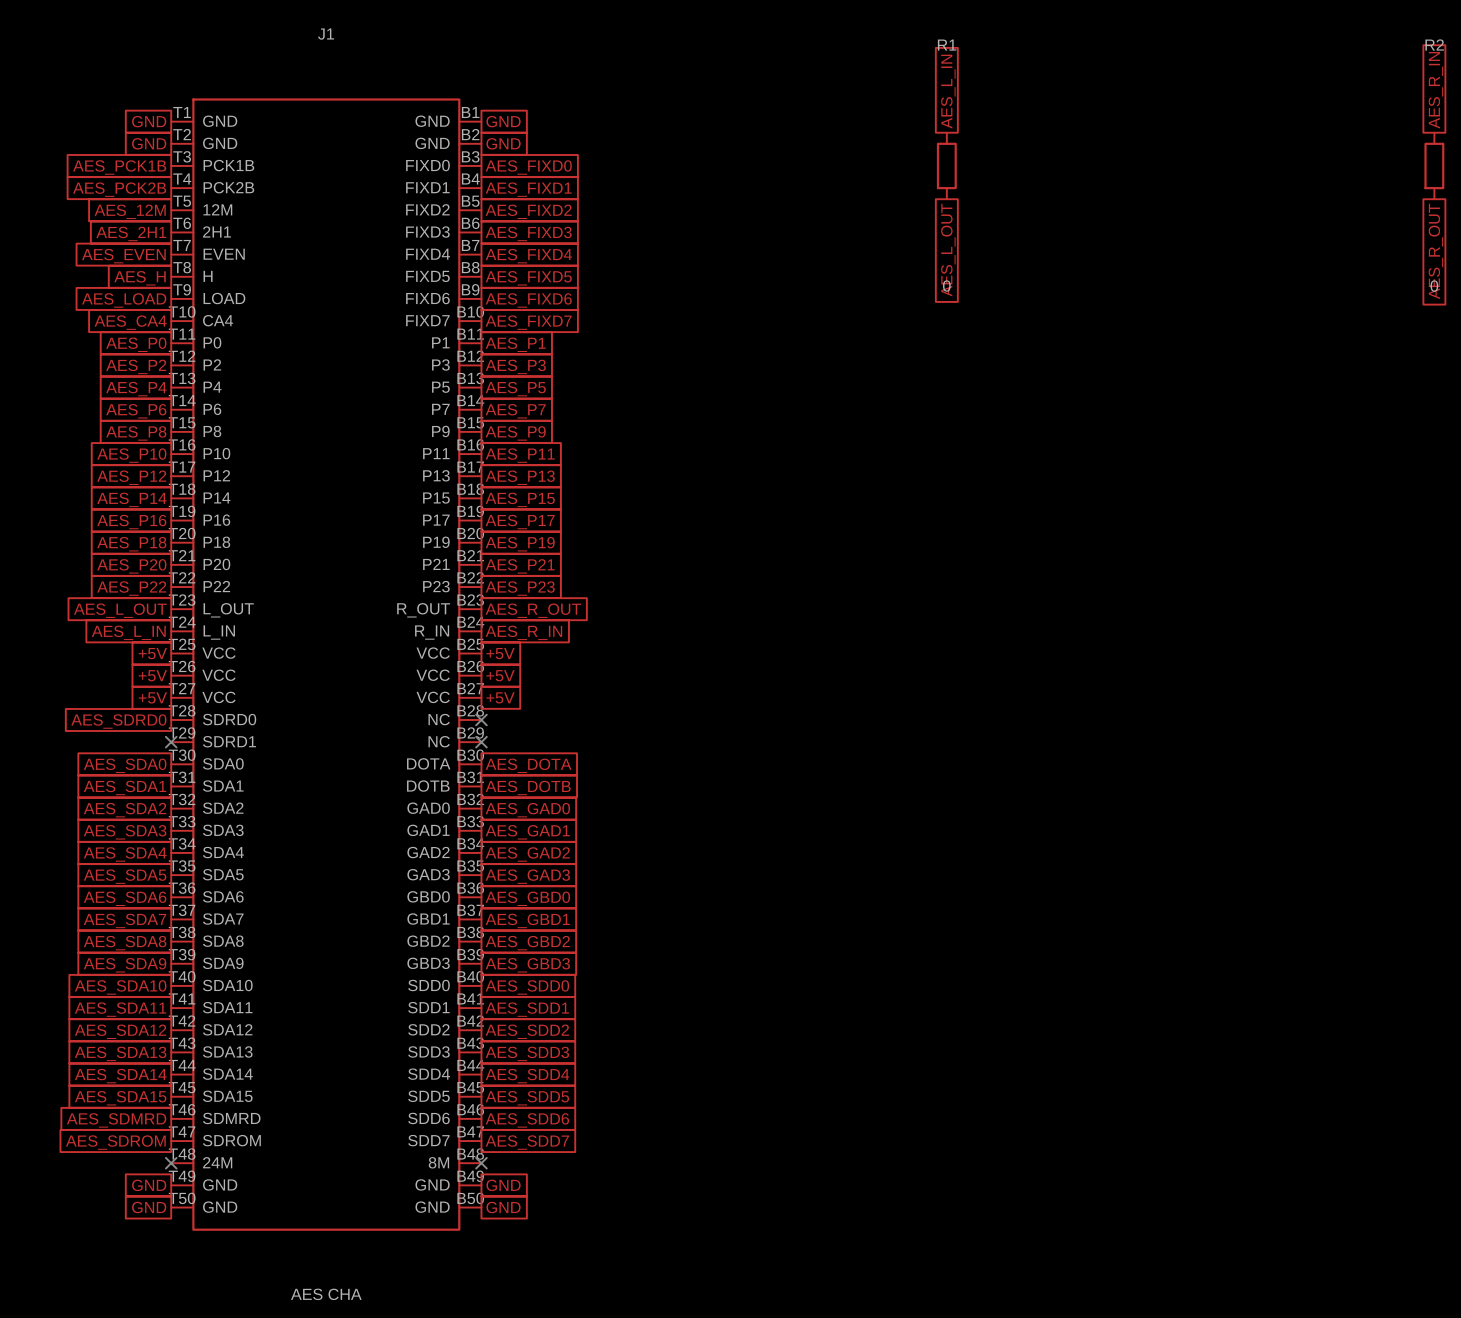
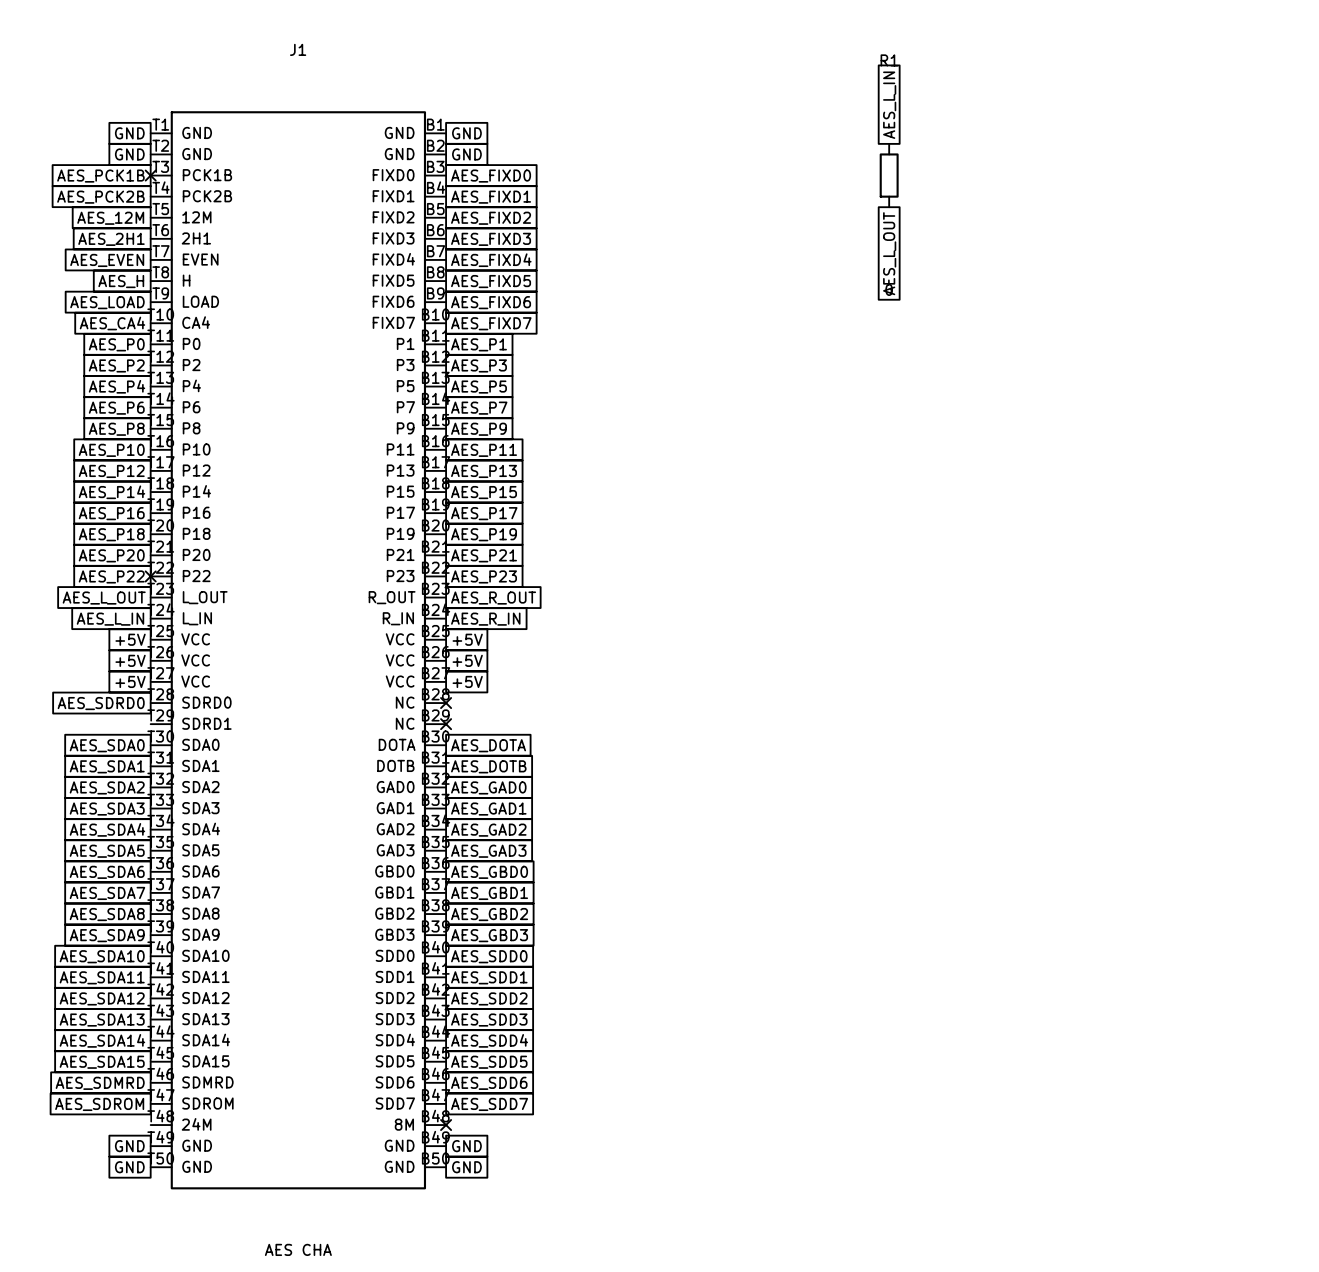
no-connect mark: none -> (150, 175)
no-connect mark: none -> (150, 576)
no-connect mark: (171, 742) -> none
no-connect mark: (171, 1163) -> none

